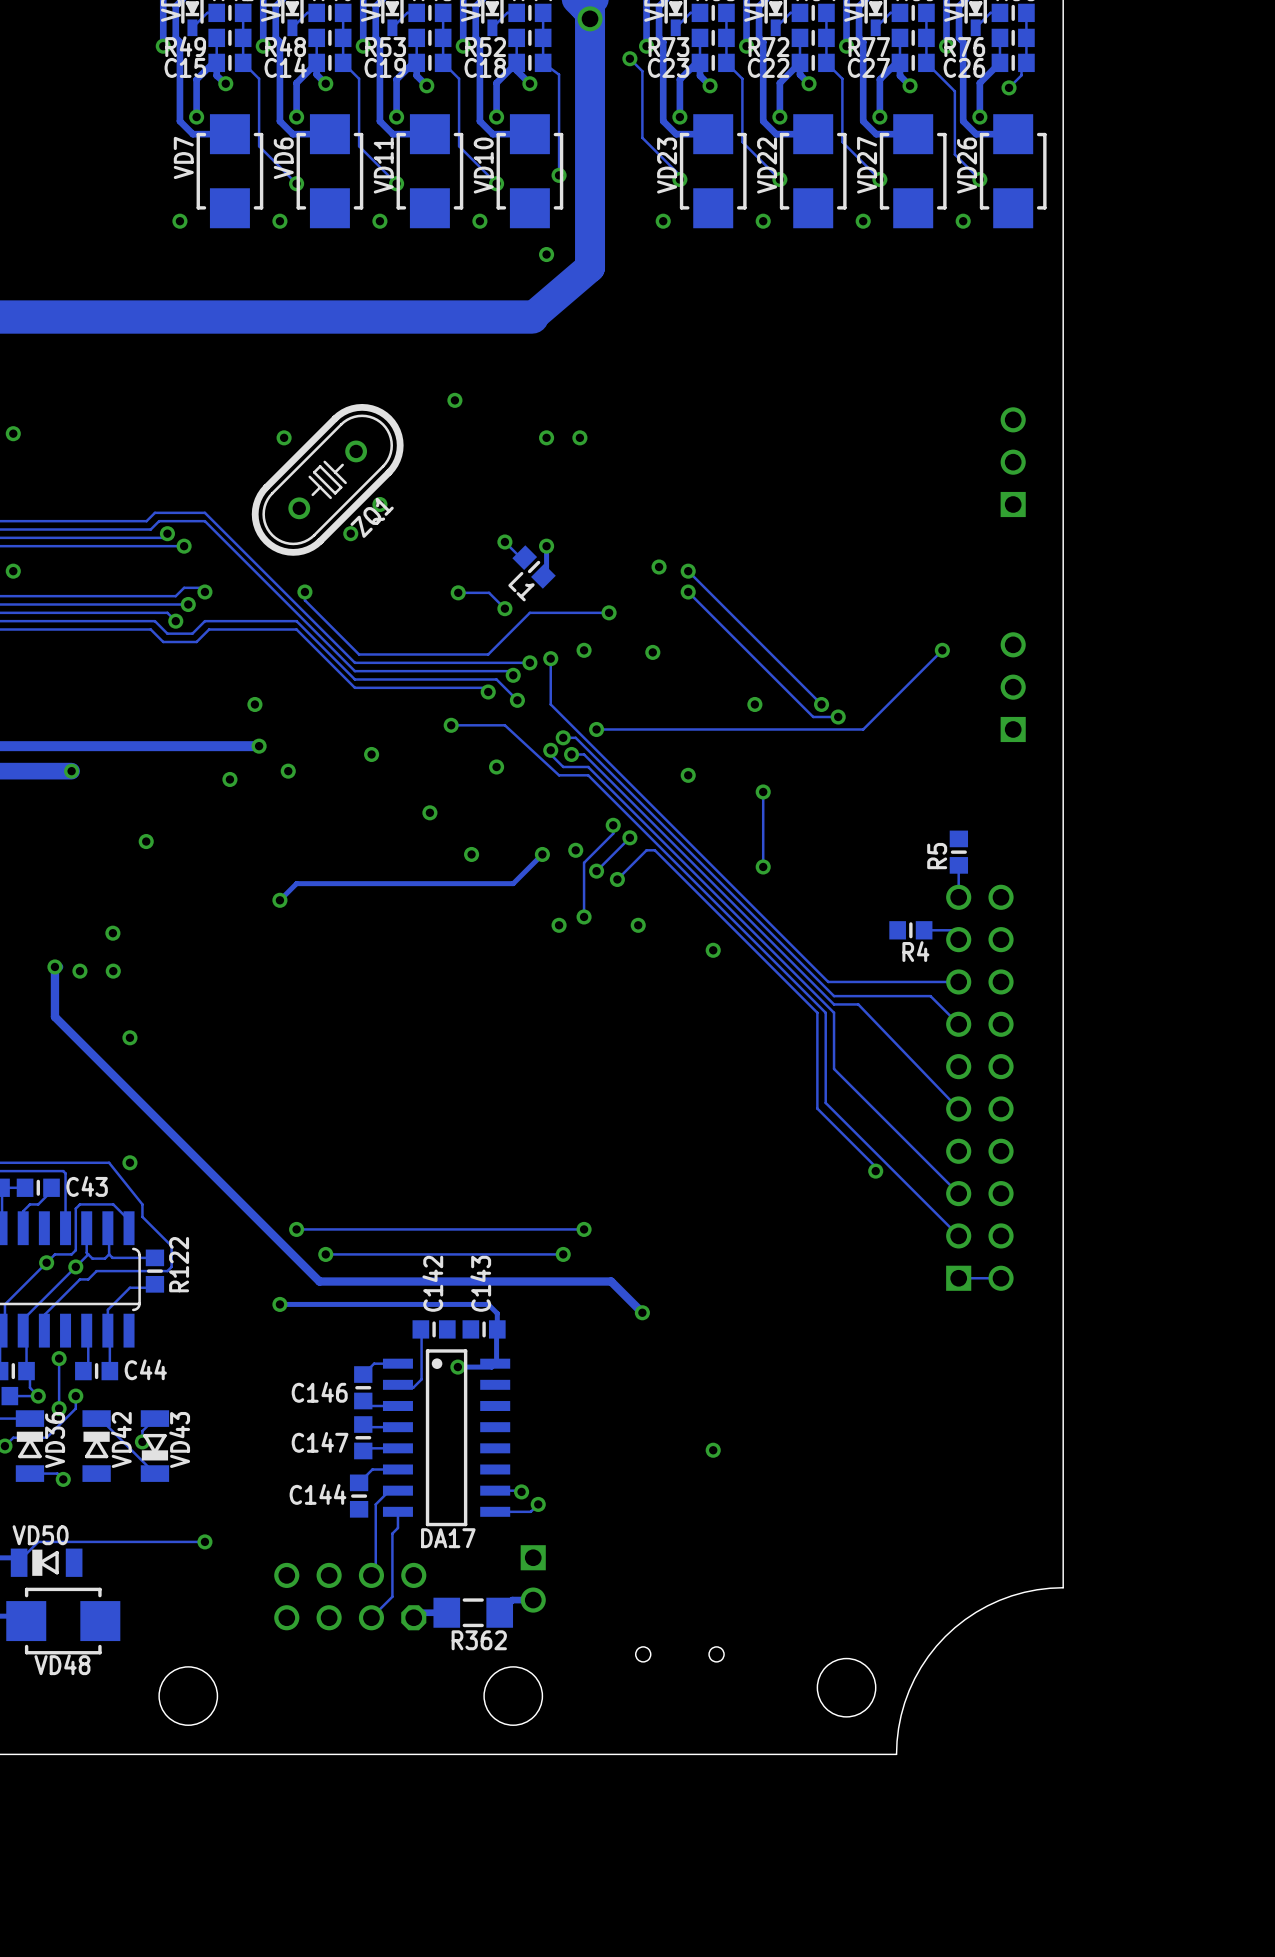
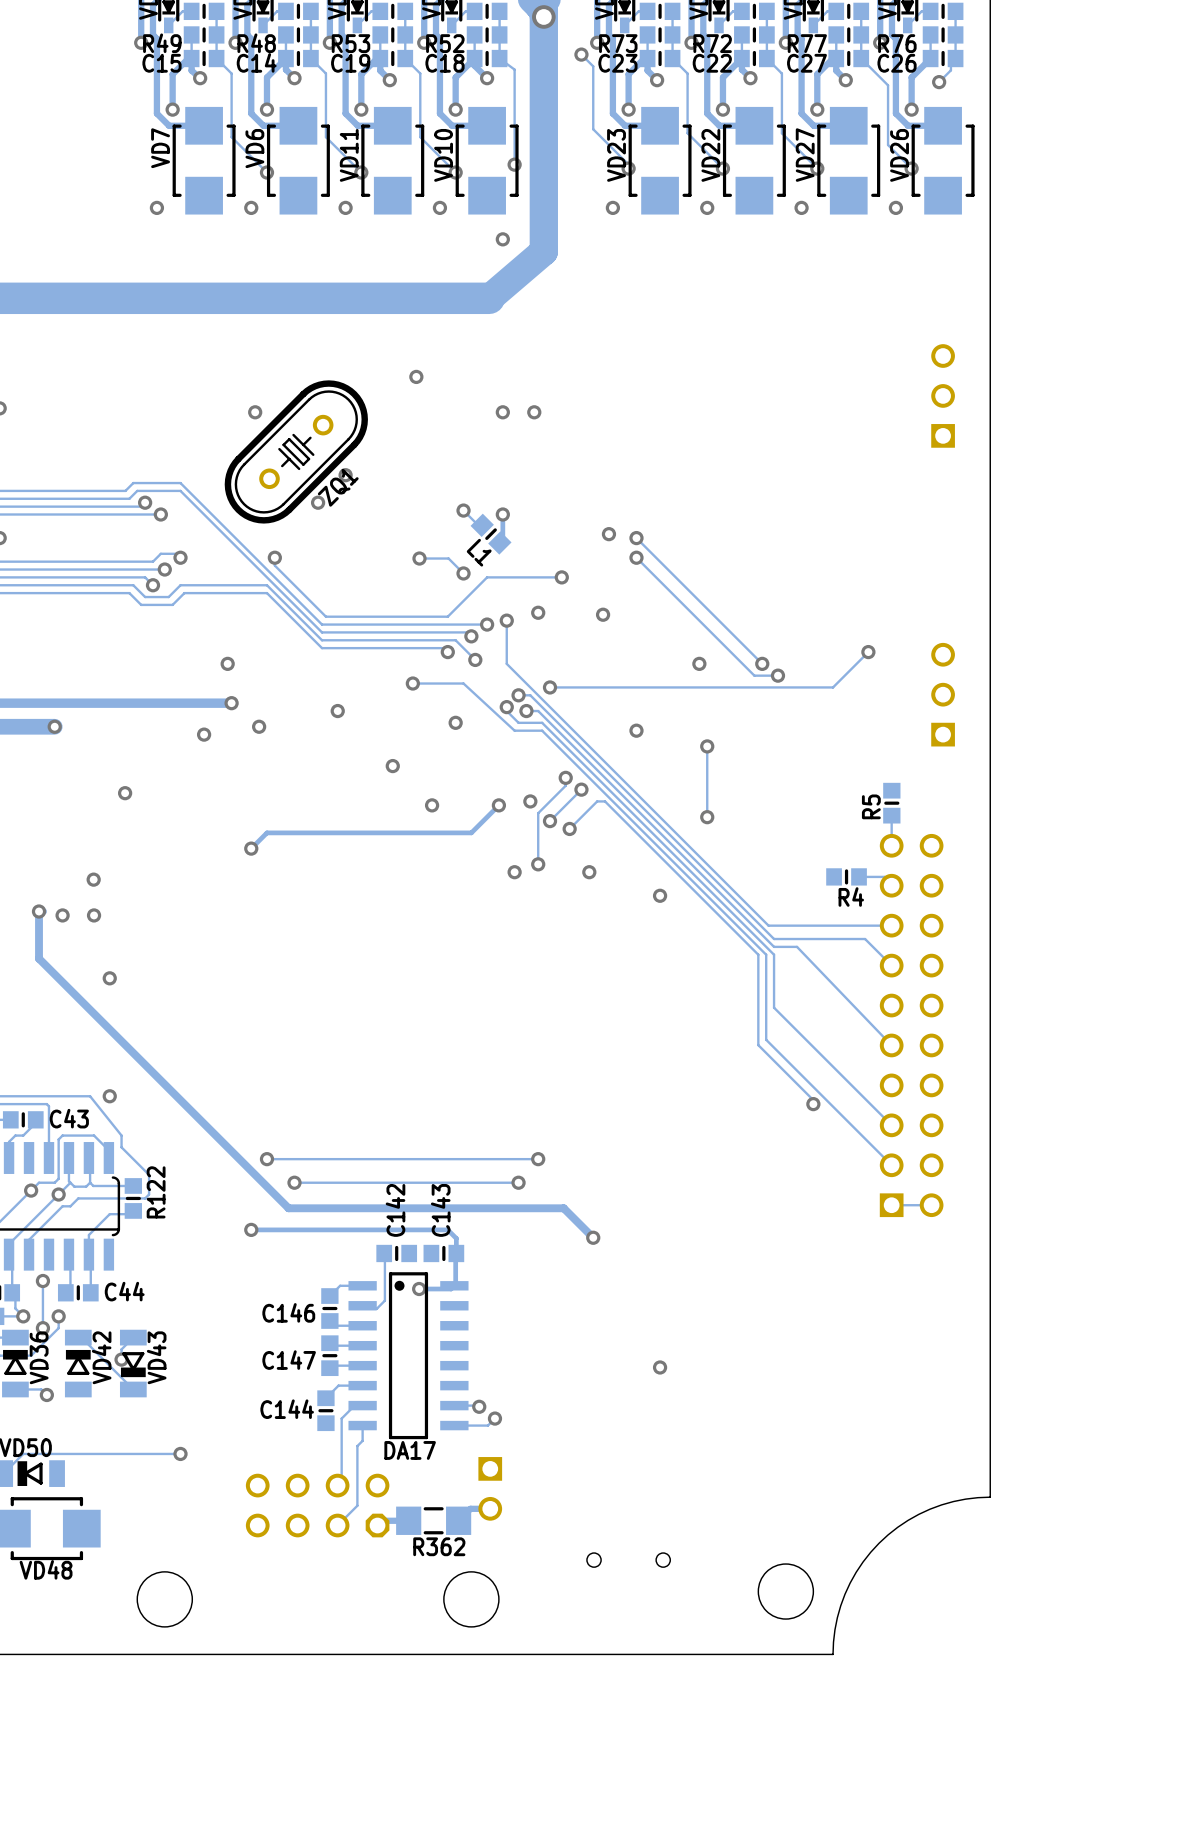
part position: (1013, 462) -> (943, 395)
track: (942, 650) (863, 729) -> (868, 652) (833, 687) (801, 687)
via position: (942, 650) -> (868, 652)
part position: (1013, 687) -> (943, 694)

